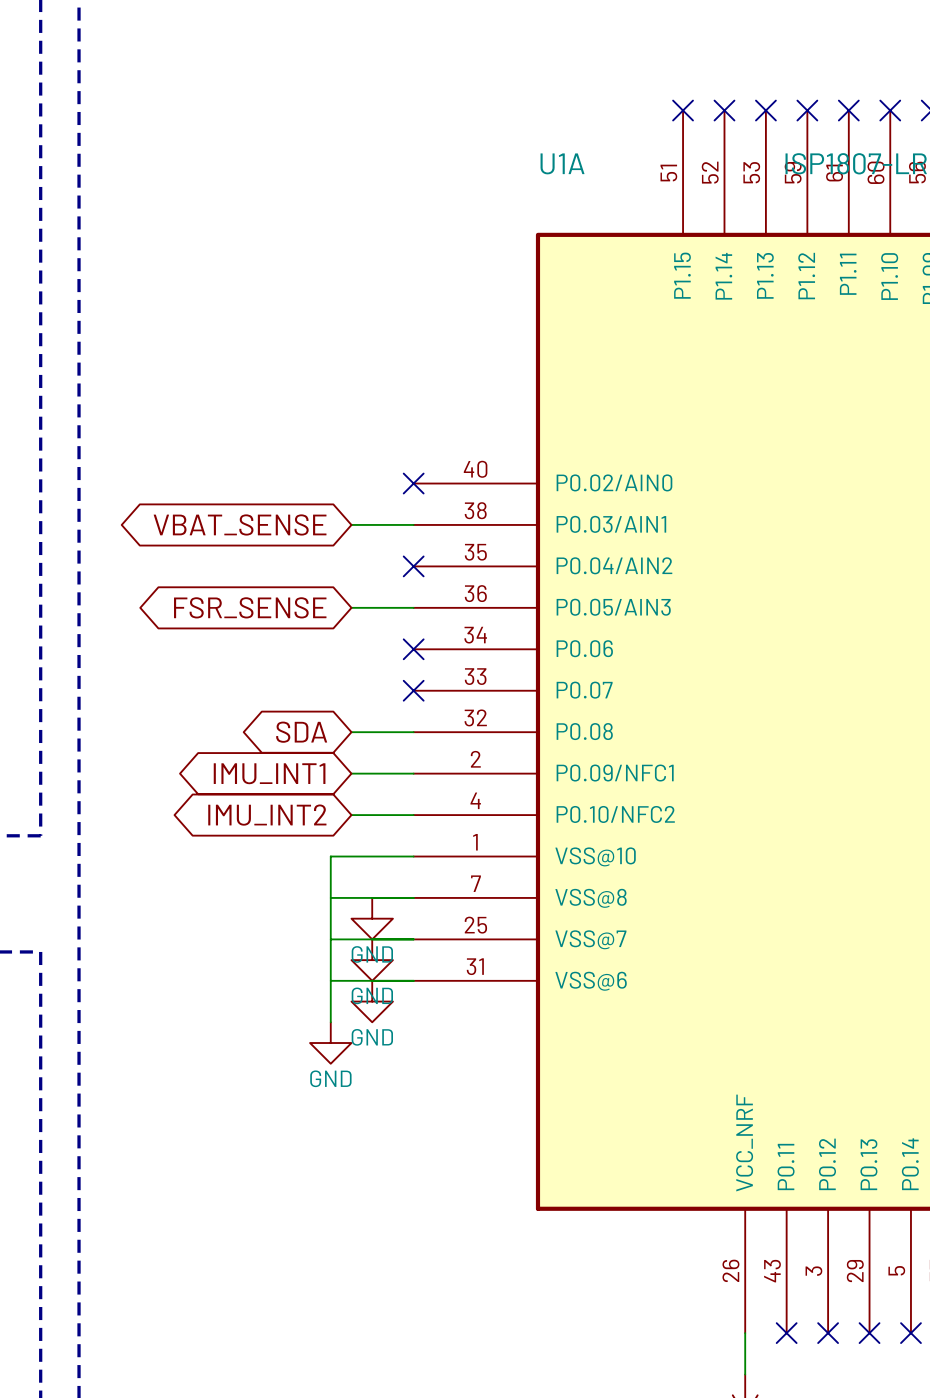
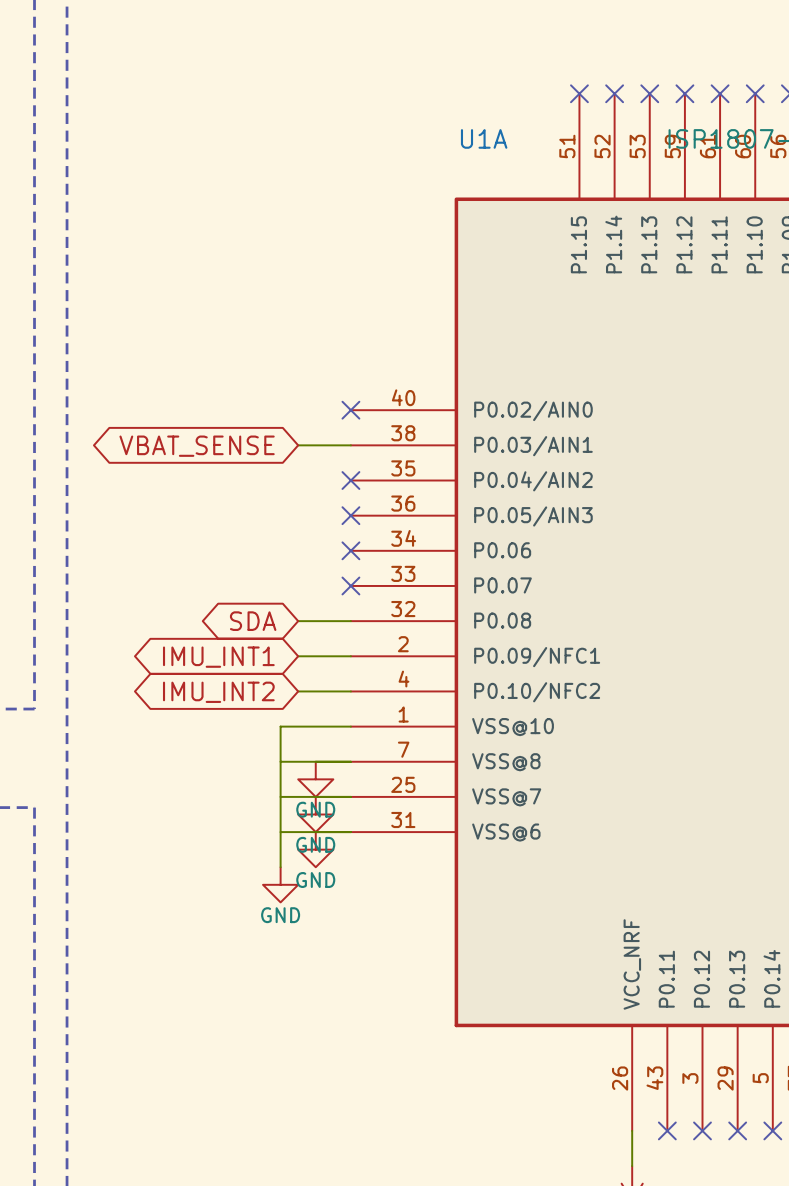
global label: FSR_SENSE (250, 607) -> none
wire: (351, 607) (413, 607) -> none
no-connect mark: none -> (350, 515)

